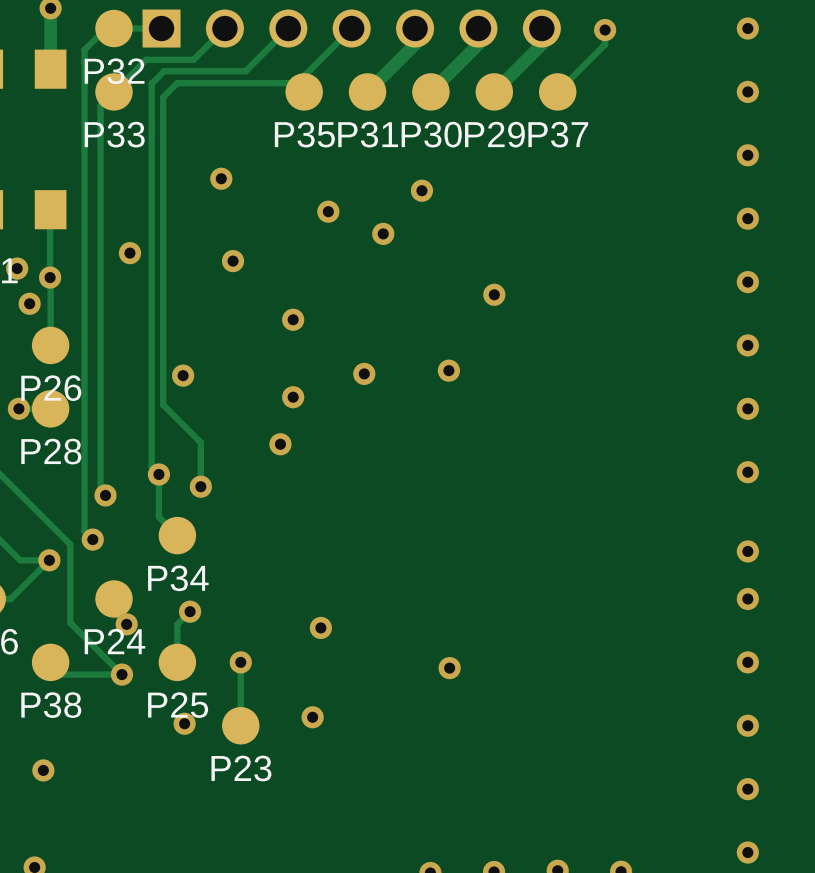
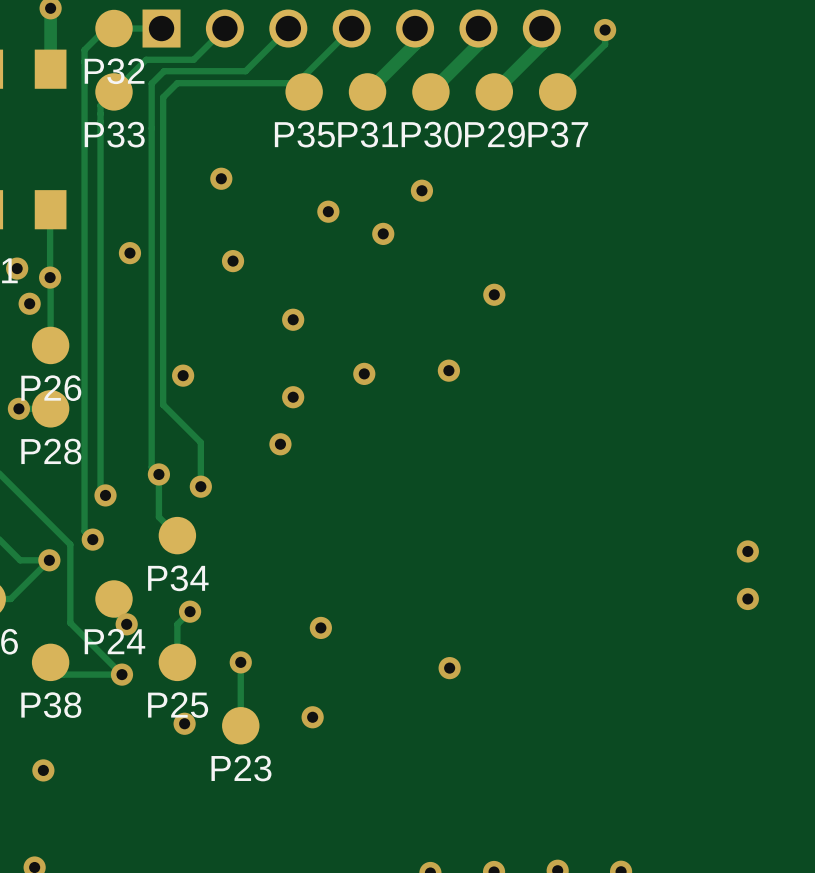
via: (747, 28) -> none
via: (747, 91) -> none
via: (747, 155) -> none
via: (747, 218) -> none
via: (747, 282) -> none
via: (747, 345) -> none
via: (747, 408) -> none
via: (747, 472) -> none
via: (747, 662) -> none
via: (747, 725) -> none
via: (747, 789) -> none
via: (747, 852) -> none

